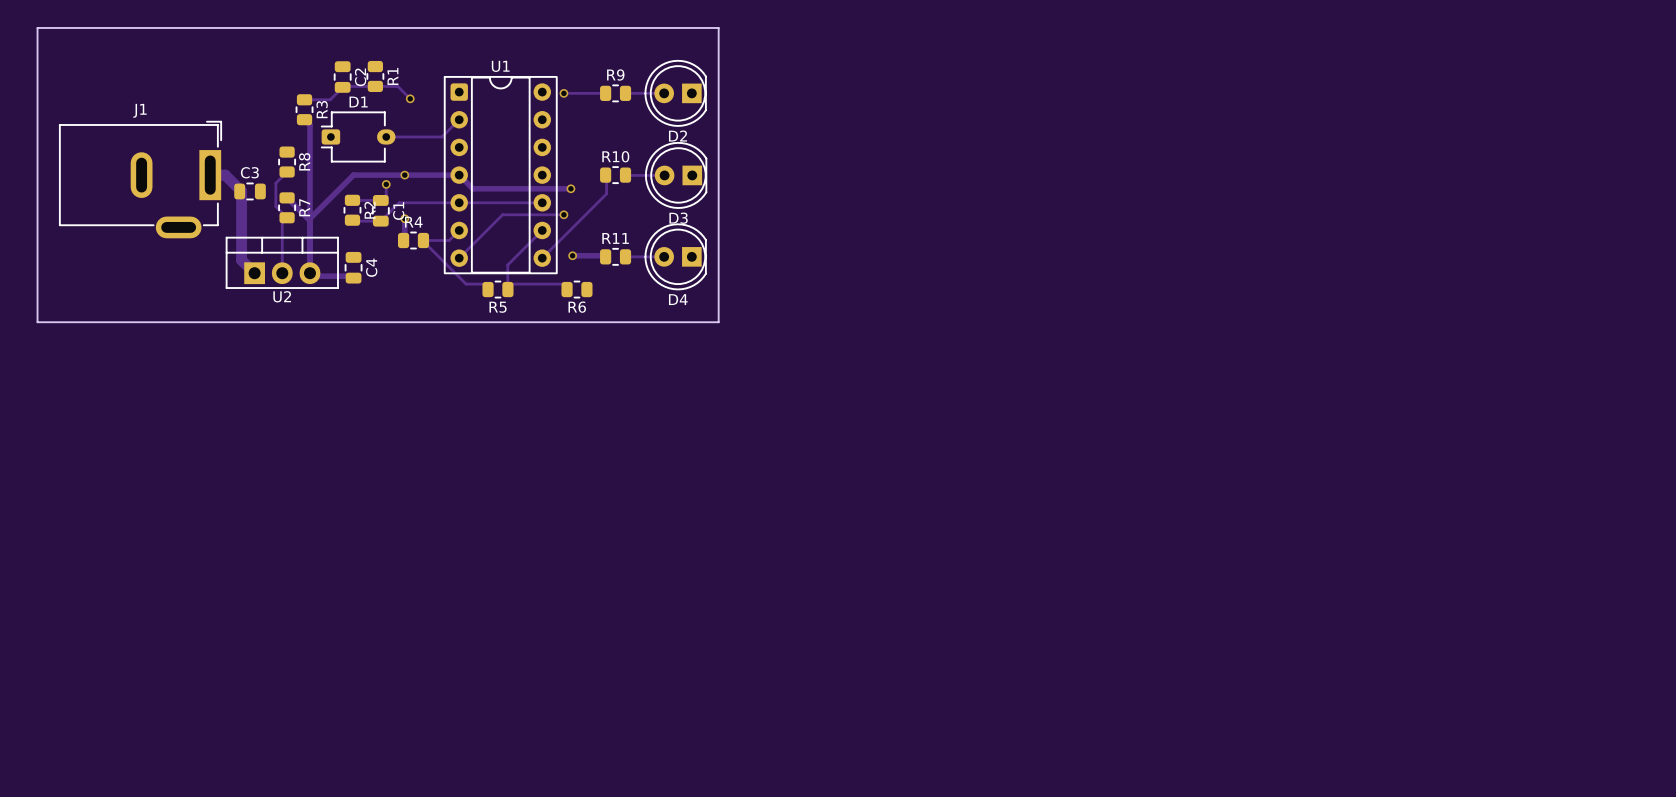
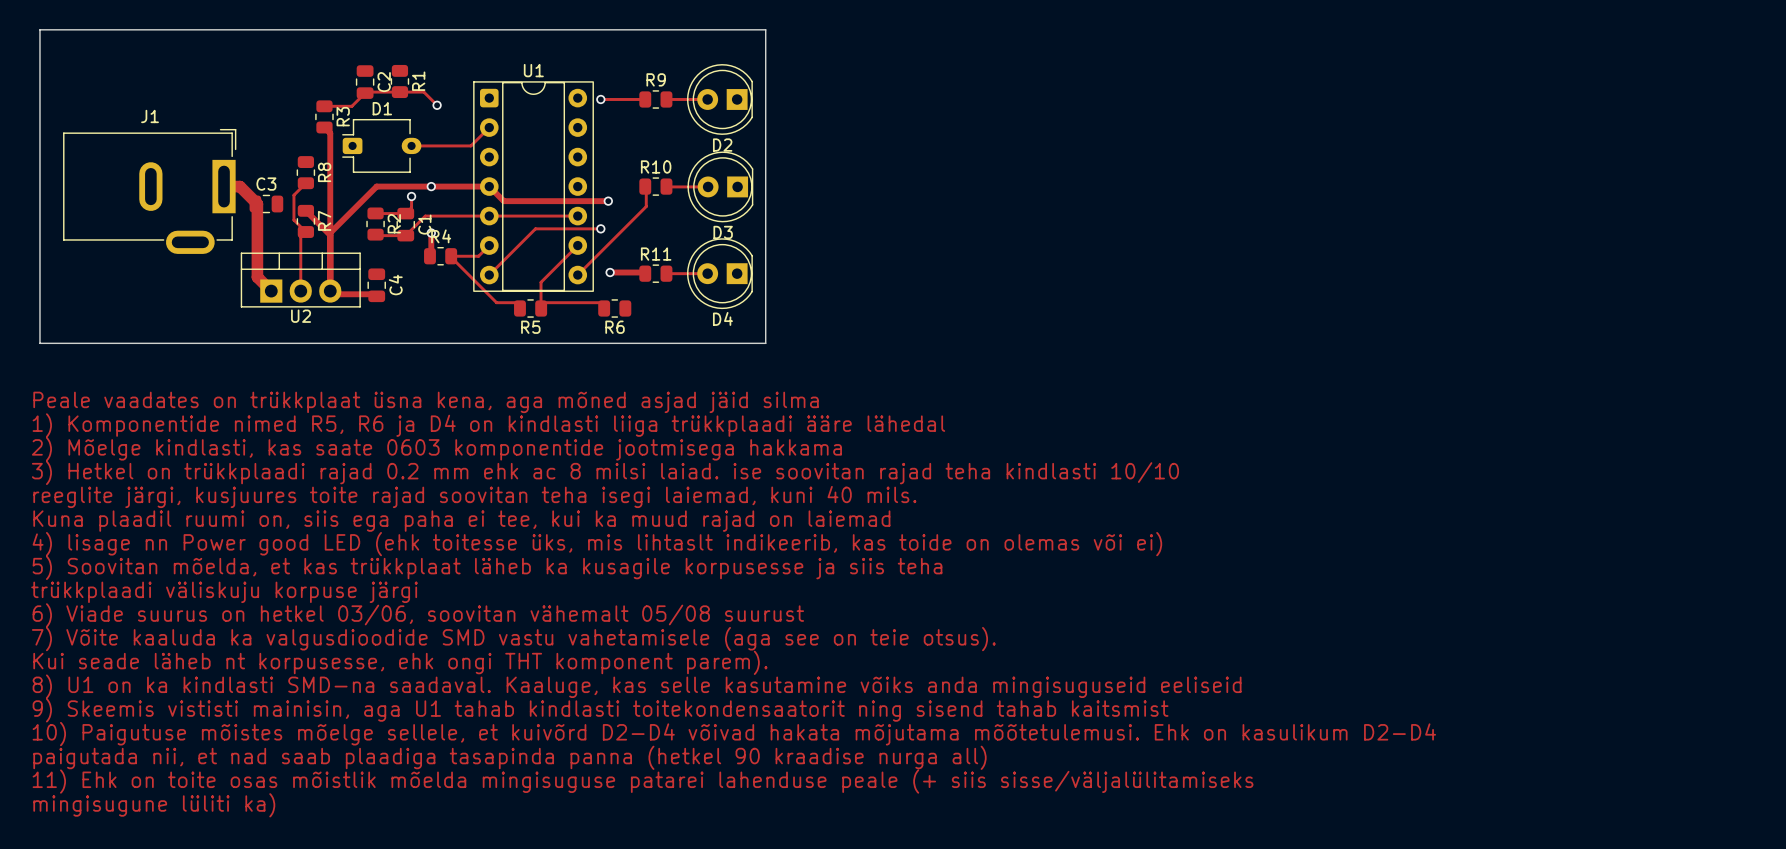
text: none -> Peale vaadates on trükkplaat üsna kena, aga mõned asjad jäid silma (426, 402)
text: none -> 1) Komponentide nimed R5, R6 ja D4 on kindlasti liiga trükkplaadi ääre lähedal (488, 425)
text: none -> 2) Mõelge kindlasti, kas saate 0603 komponentide jootmisega hakkama (436, 449)
text: none -> 3) Hetkel on trükkplaadi rajad 0.2 mm ehk ac 8 milsi laiad. ise soovitan rajad teha kindlasti 10/10 (605, 472)
text: none -> reeglite järgi, kusjuures toite rajad soovitan teha isegi laiemad, kuni 40 mils. (474, 496)
text: none -> Kuna plaadil ruumi on, siis ega paha ei tee, kui ka muud rajad on laiemad (461, 521)
text: none -> 4) lisage nn Power good LED (ehk toitesse üks, mis lihtaslt indikeerib, kas toide on olemas või ei) (597, 544)
text: none -> 5) Soovitan mõelda, et kas trükkplaat läheb ka kusagile korpusesse ja siis teha (487, 567)
text: none -> trükkplaadi väliskuju korpuse järgi (224, 592)
text: none -> 6) Viade suurus on hetkel 03/06, soovitan vähemalt 05/08 suurust (418, 615)
text: none -> 7) Võite kaaluda ka valgusdioodide SMD vastu vahetamisele (aga see on teie otsus). (513, 639)
text: none -> Kui seade läheb nt korpusesse, ehk ongi THT komponent parem). (400, 662)
text: none -> 8) U1 on ka kindlasti SMD-na saadaval. Kaaluge, kas selle kasutamine võiks anda mingisuguseid eeliseid (637, 686)
text: none -> 9) Skeemis vististi mainisin, aga U1 tahab kindlasti toitekondensaatorit ning sisend tahab kaitsmist (600, 710)
text: none -> 10) Paigutuse mõistes mõelge sellele, et kuivõrd D2-D4 võivad hakata mõjutama mõõtetulemusi. Ehk on kasulikum D2-D4 (734, 734)
text: none -> paigutada nii, et nad saab plaadiga tasapinda panna (hetkel 90 kraadise nurga all) (509, 757)
text: none -> 11) Ehk on toite osas mõistlik mõelda mingisuguse patarei lahenduse peale (+ siis sisse/väljalülitamiseks (643, 781)
text: none -> mingisugune lüliti ka) (154, 805)

